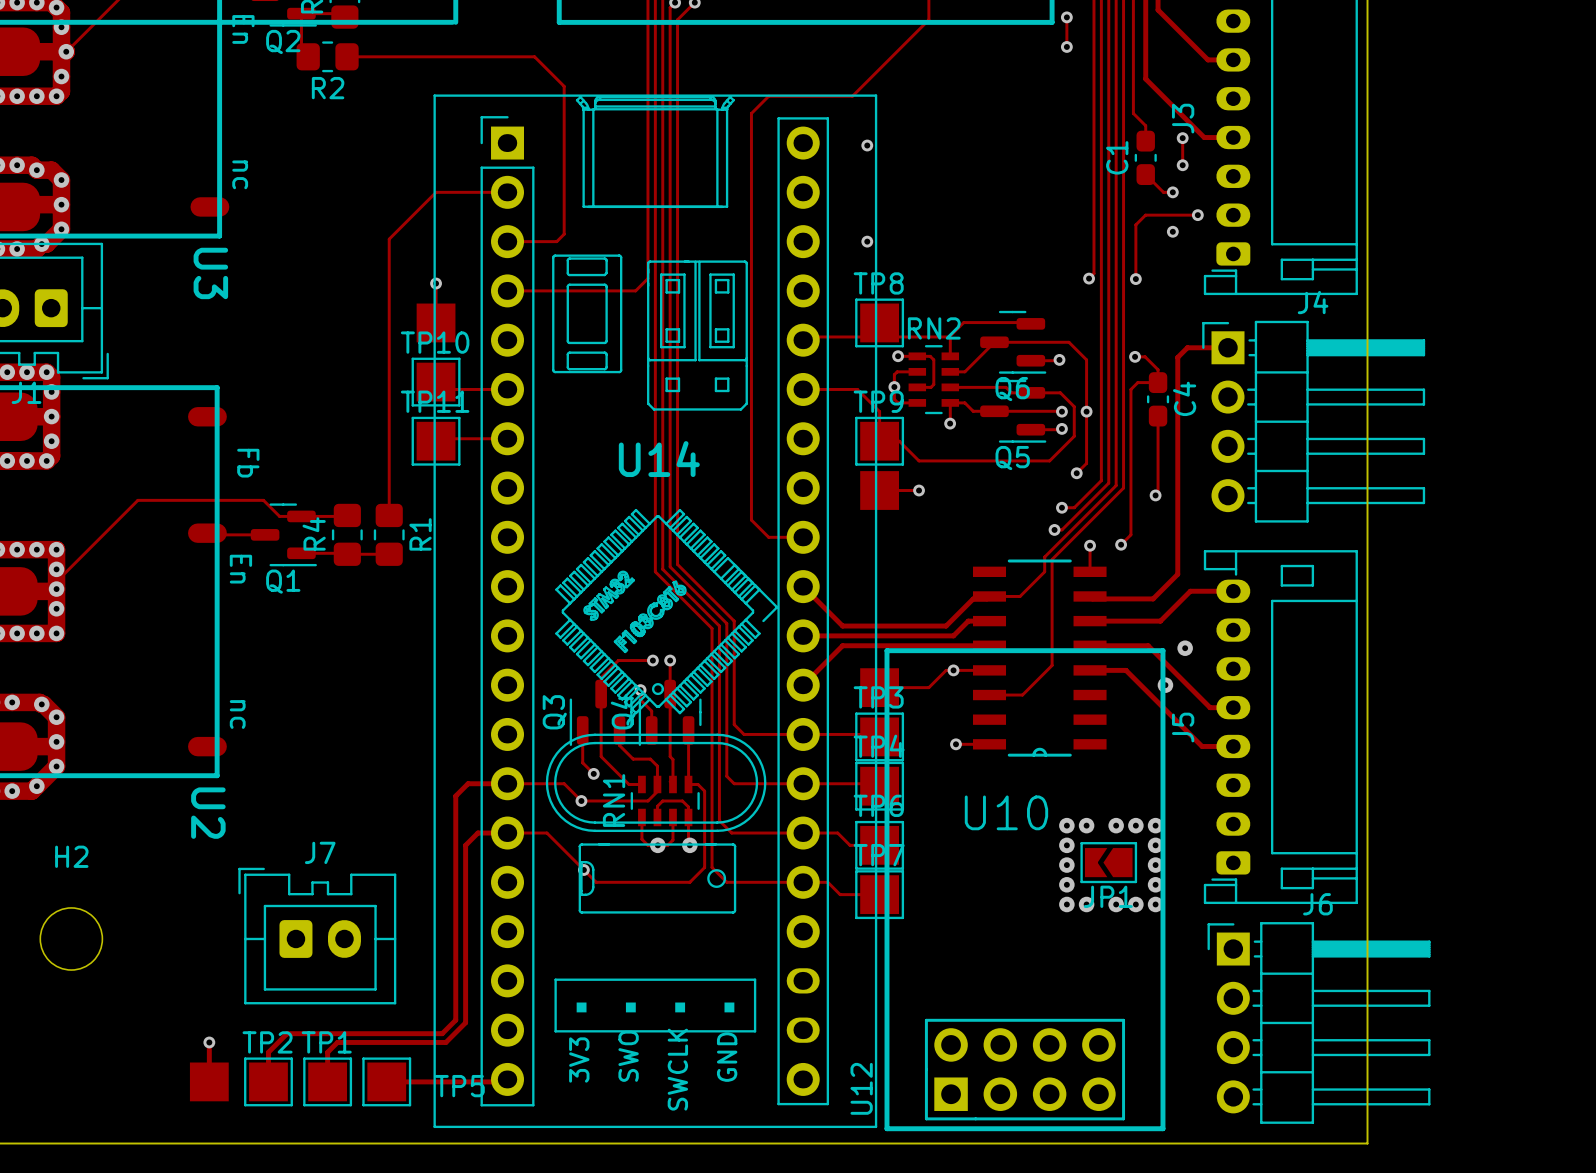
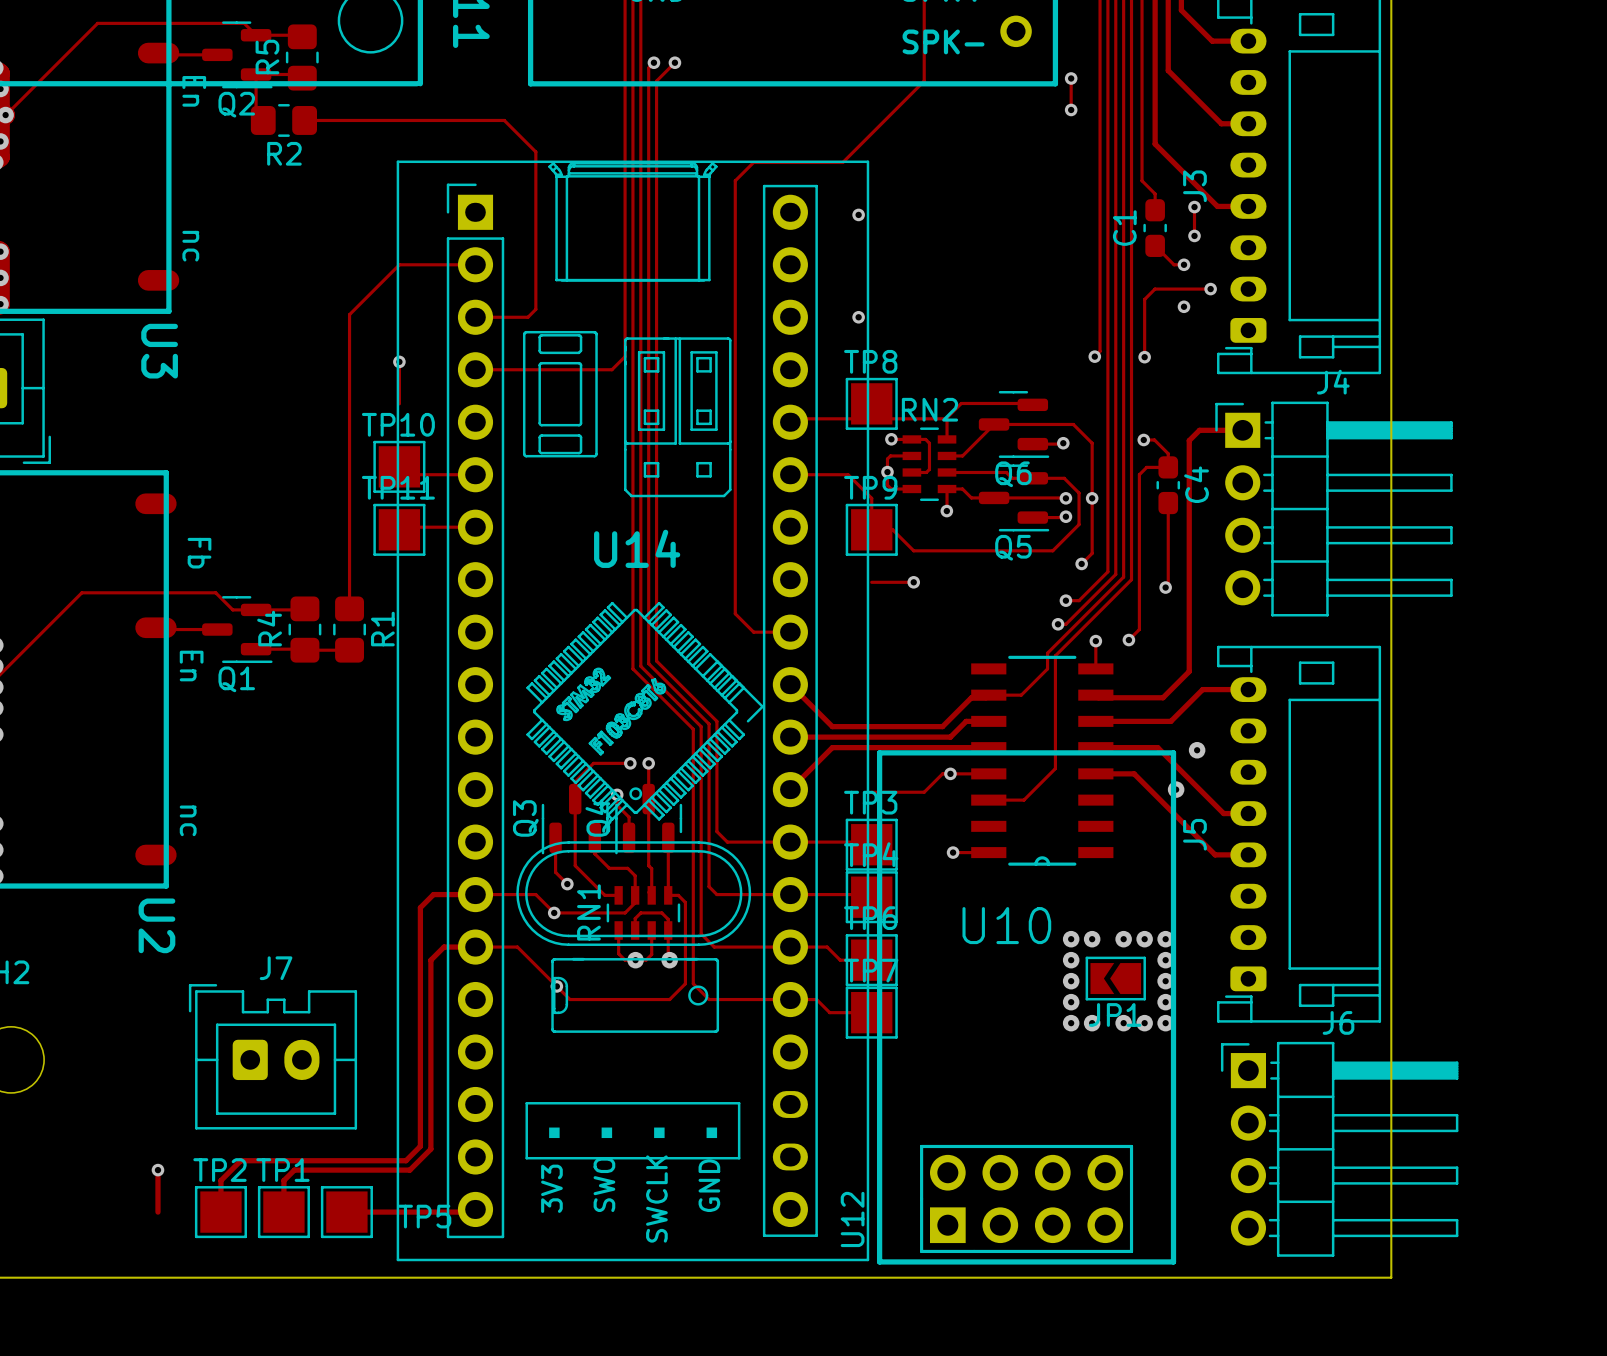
part: (436, 322) -> none
part: (879, 490) -> none
part: (879, 687) -> none
part: (209, 1081) -> none

